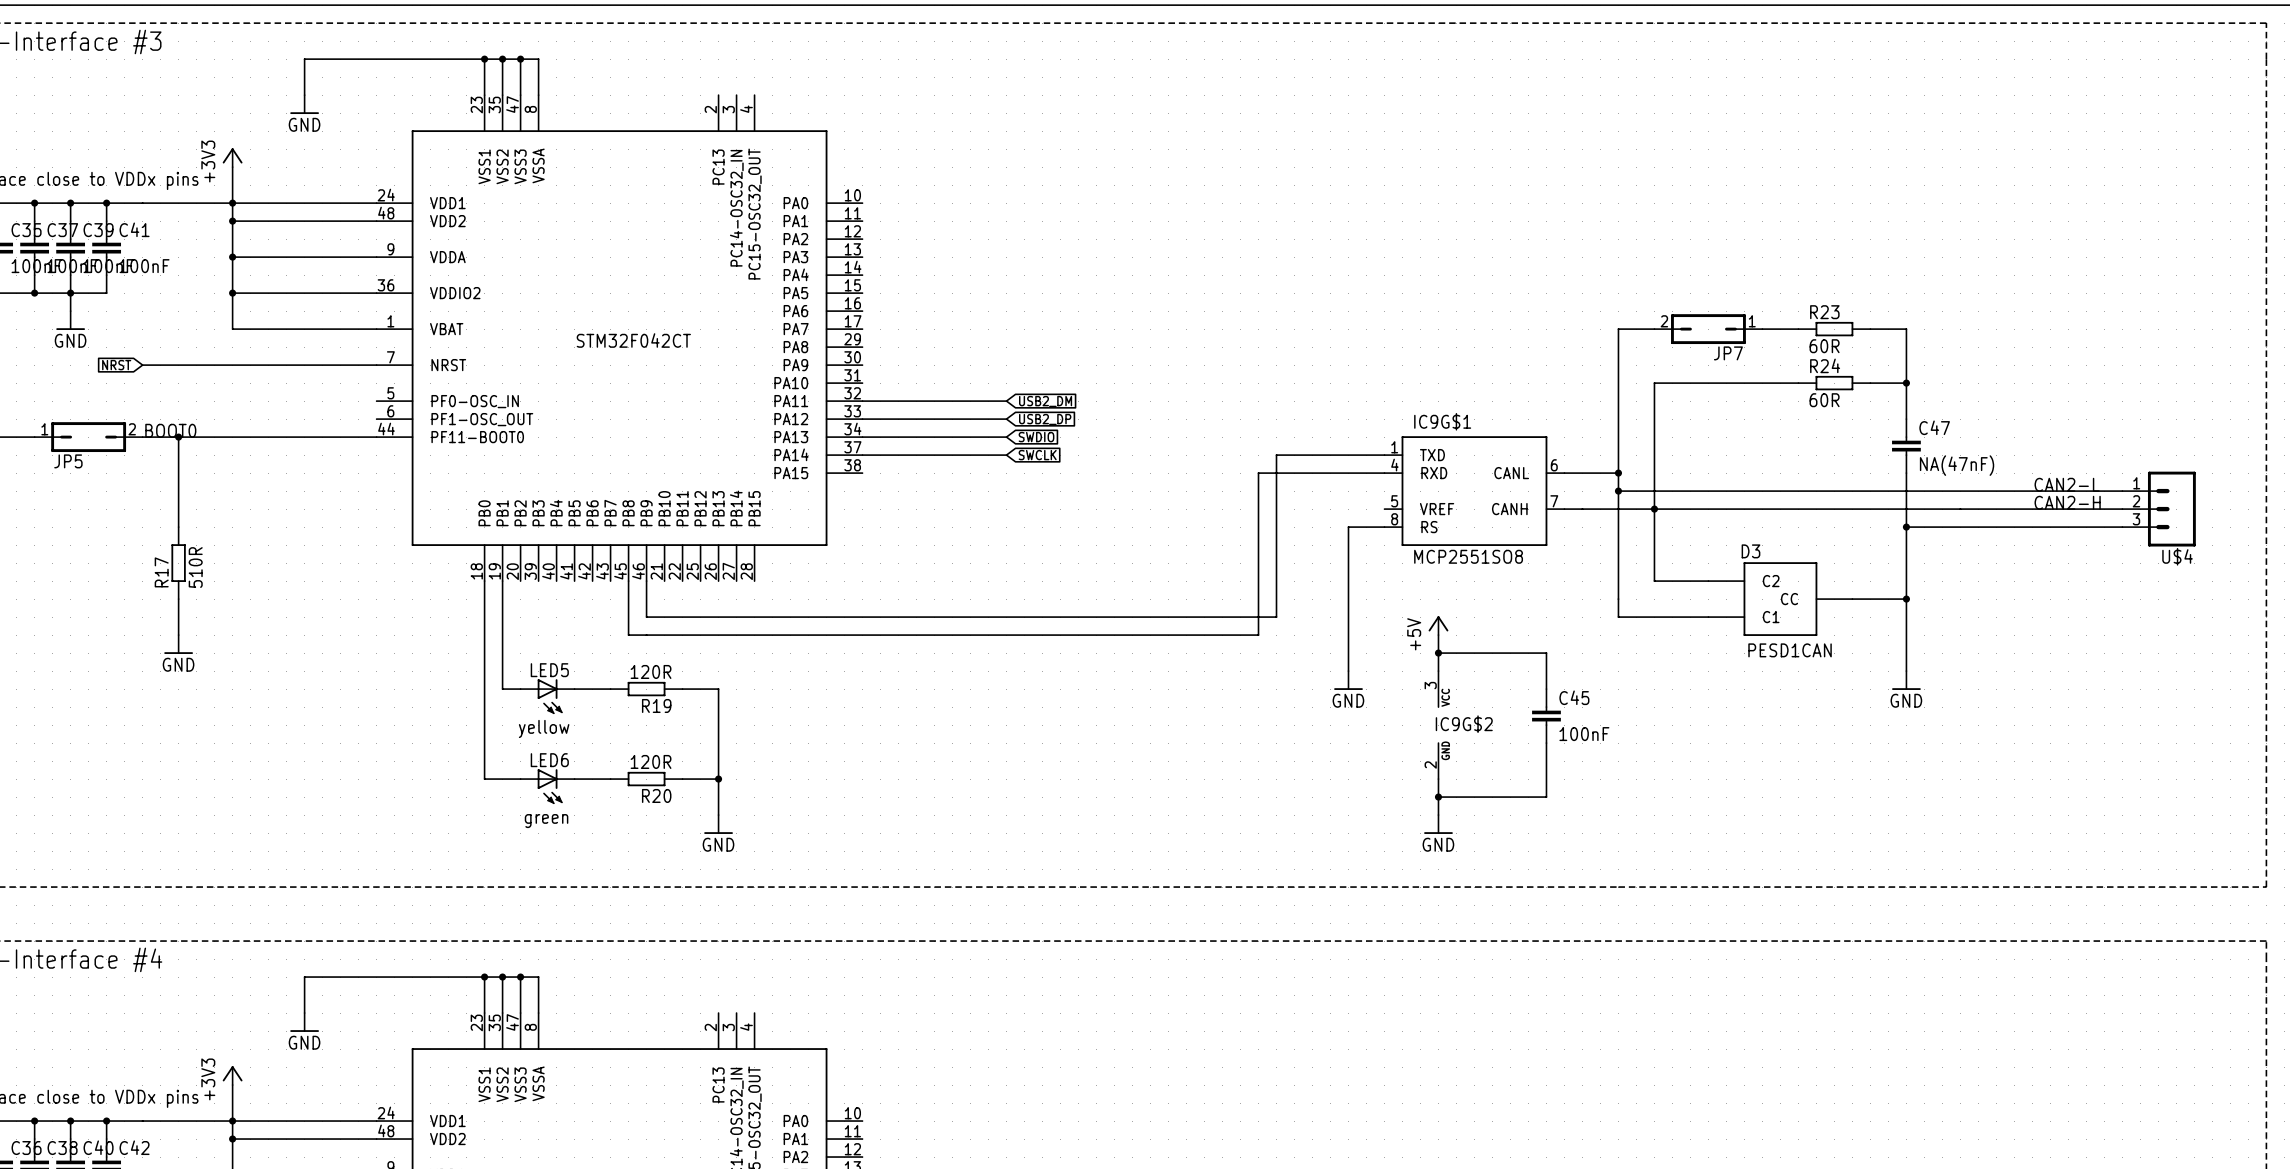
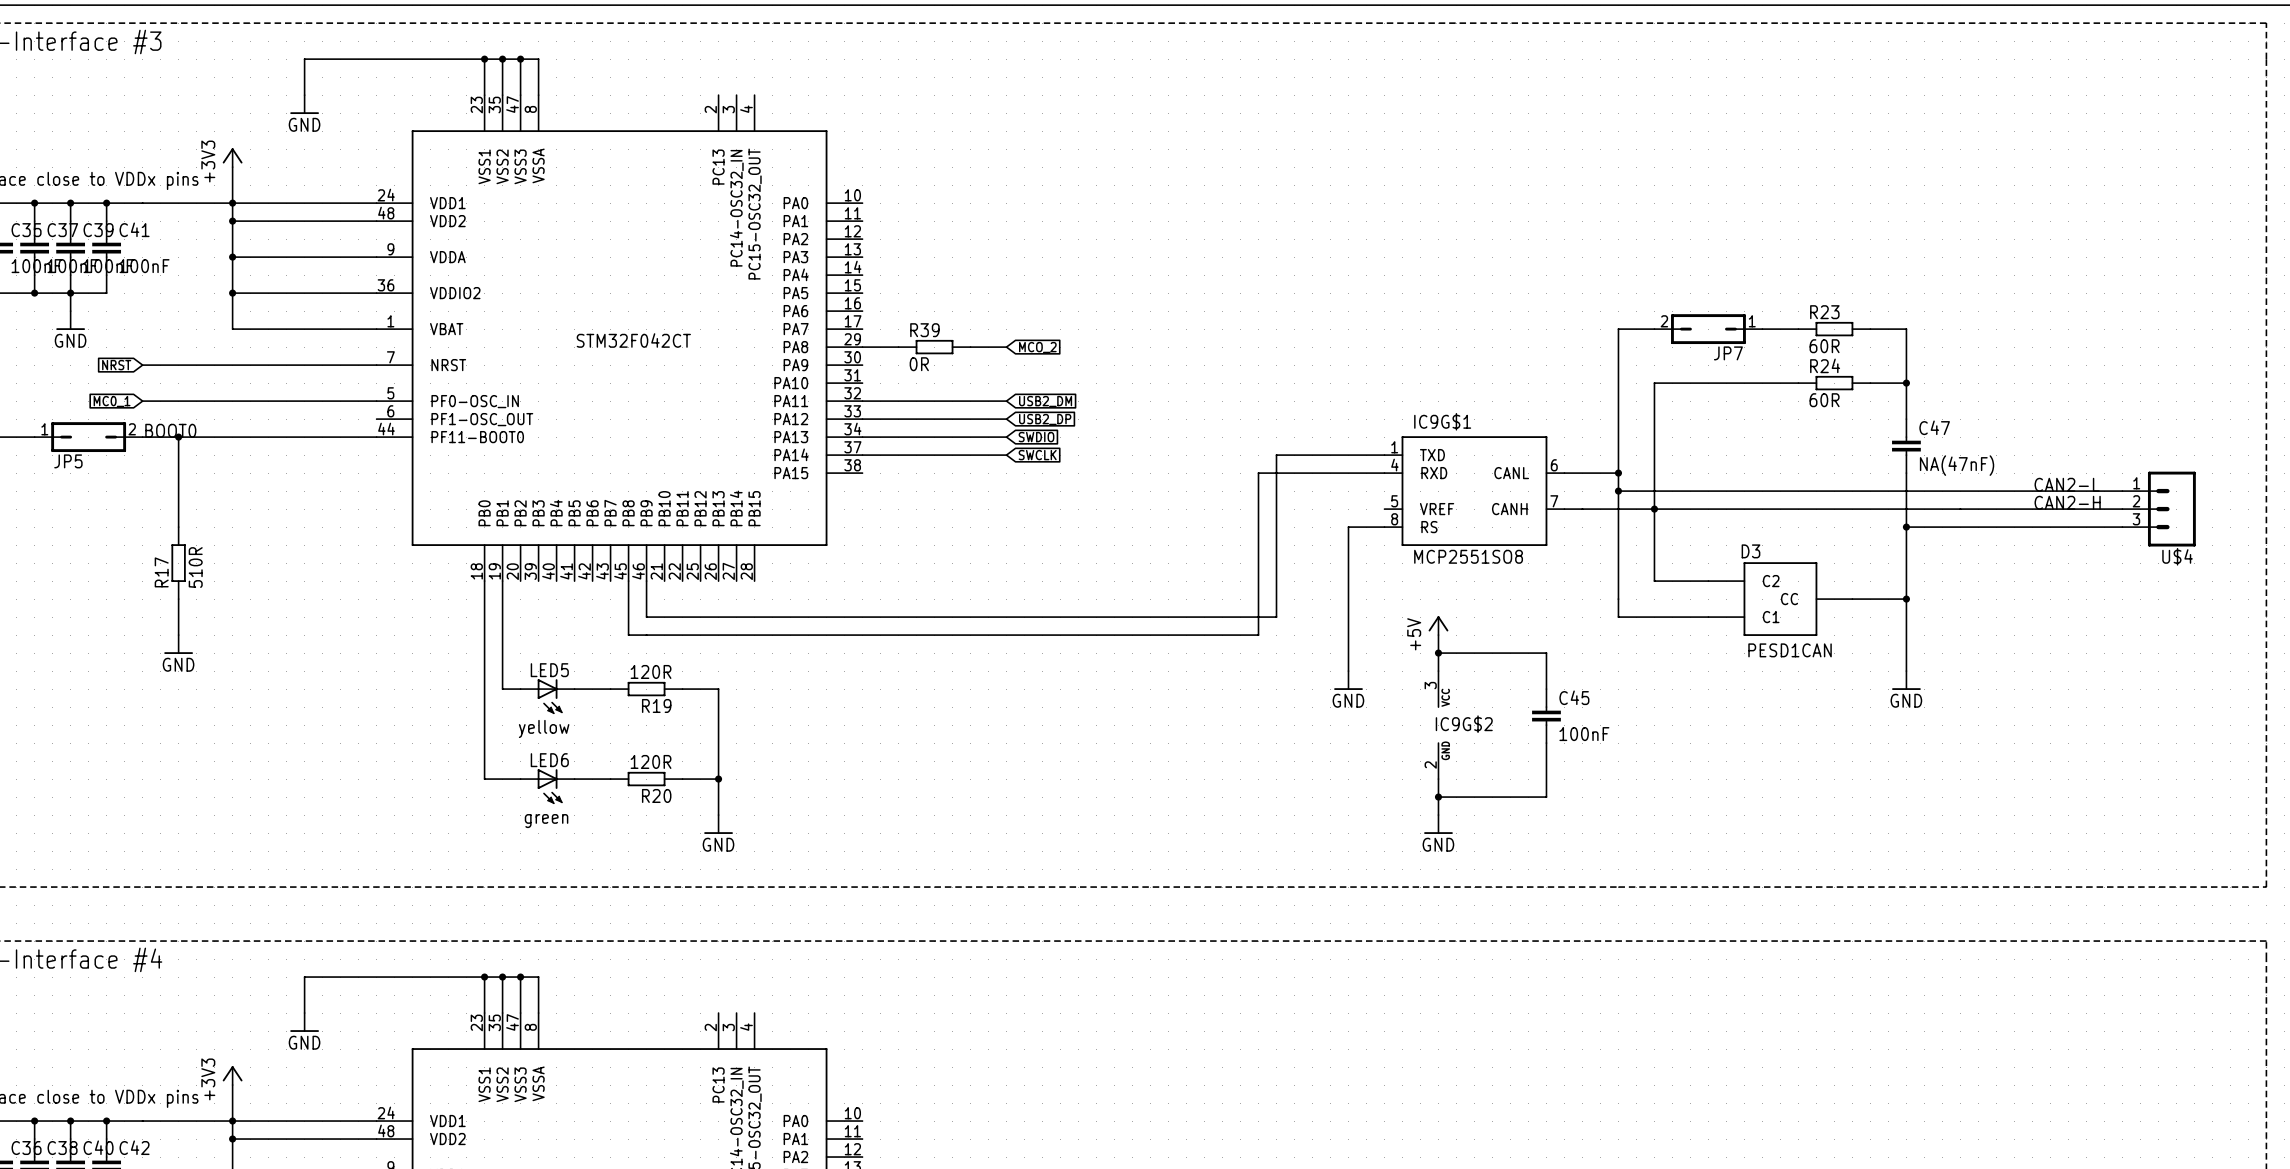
wire: none -> (862, 347) (898, 347)
R39: none -> 0R (934, 347)
wire: none -> (970, 347) (1006, 347)
global label: none -> MCO_2 (1037, 347)
global label: none -> MC0_1 (112, 401)
wire: none -> (142, 401) (376, 401)

